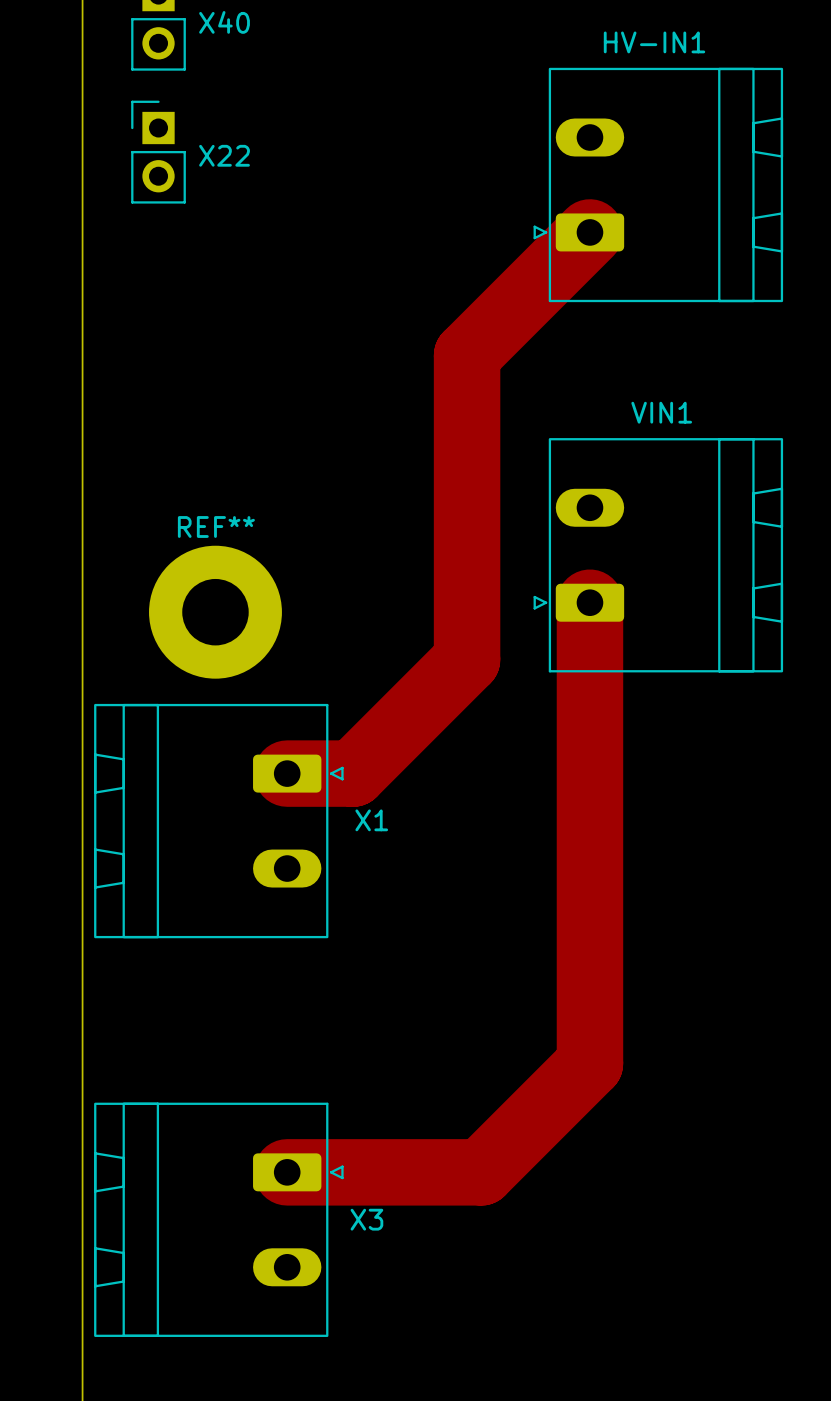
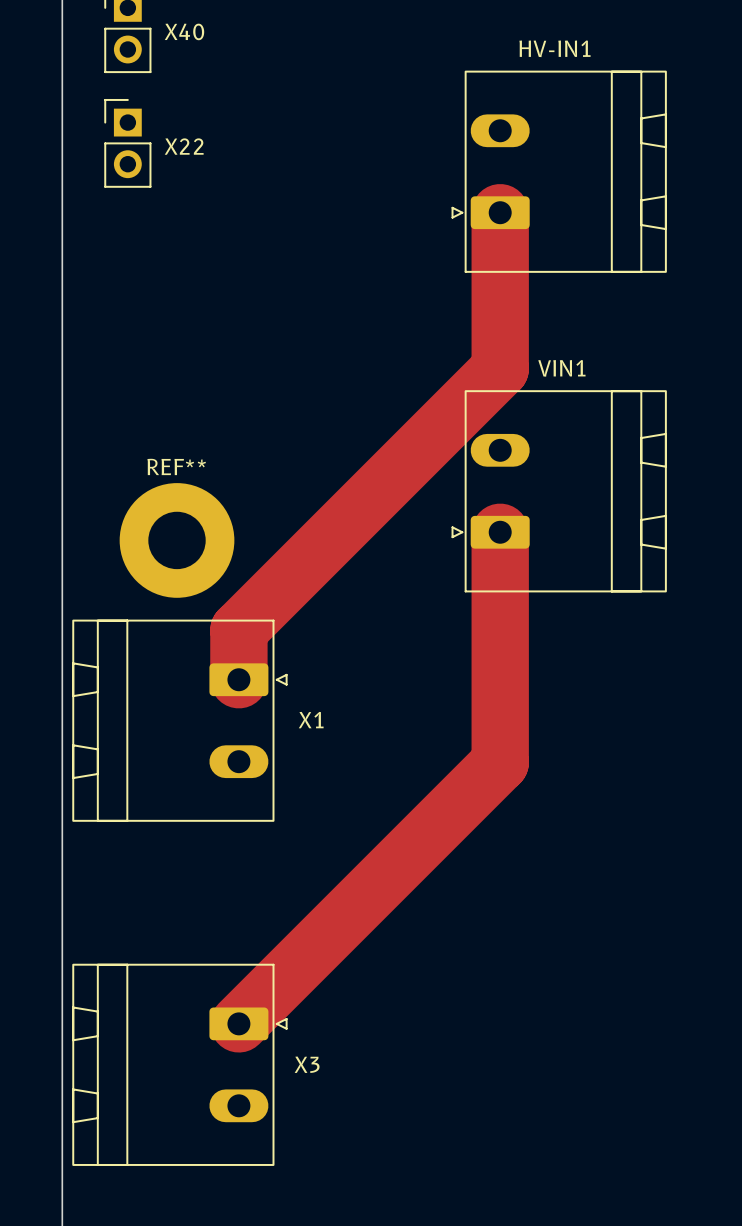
top track: (589, 232) (467, 355) (467, 659) (353, 773) (287, 773) -> (500, 212) (500, 368) (238, 630) (238, 679)
top track: (589, 869) (589, 1063) (481, 1172) (287, 1172) -> (500, 762) (238, 1023)

